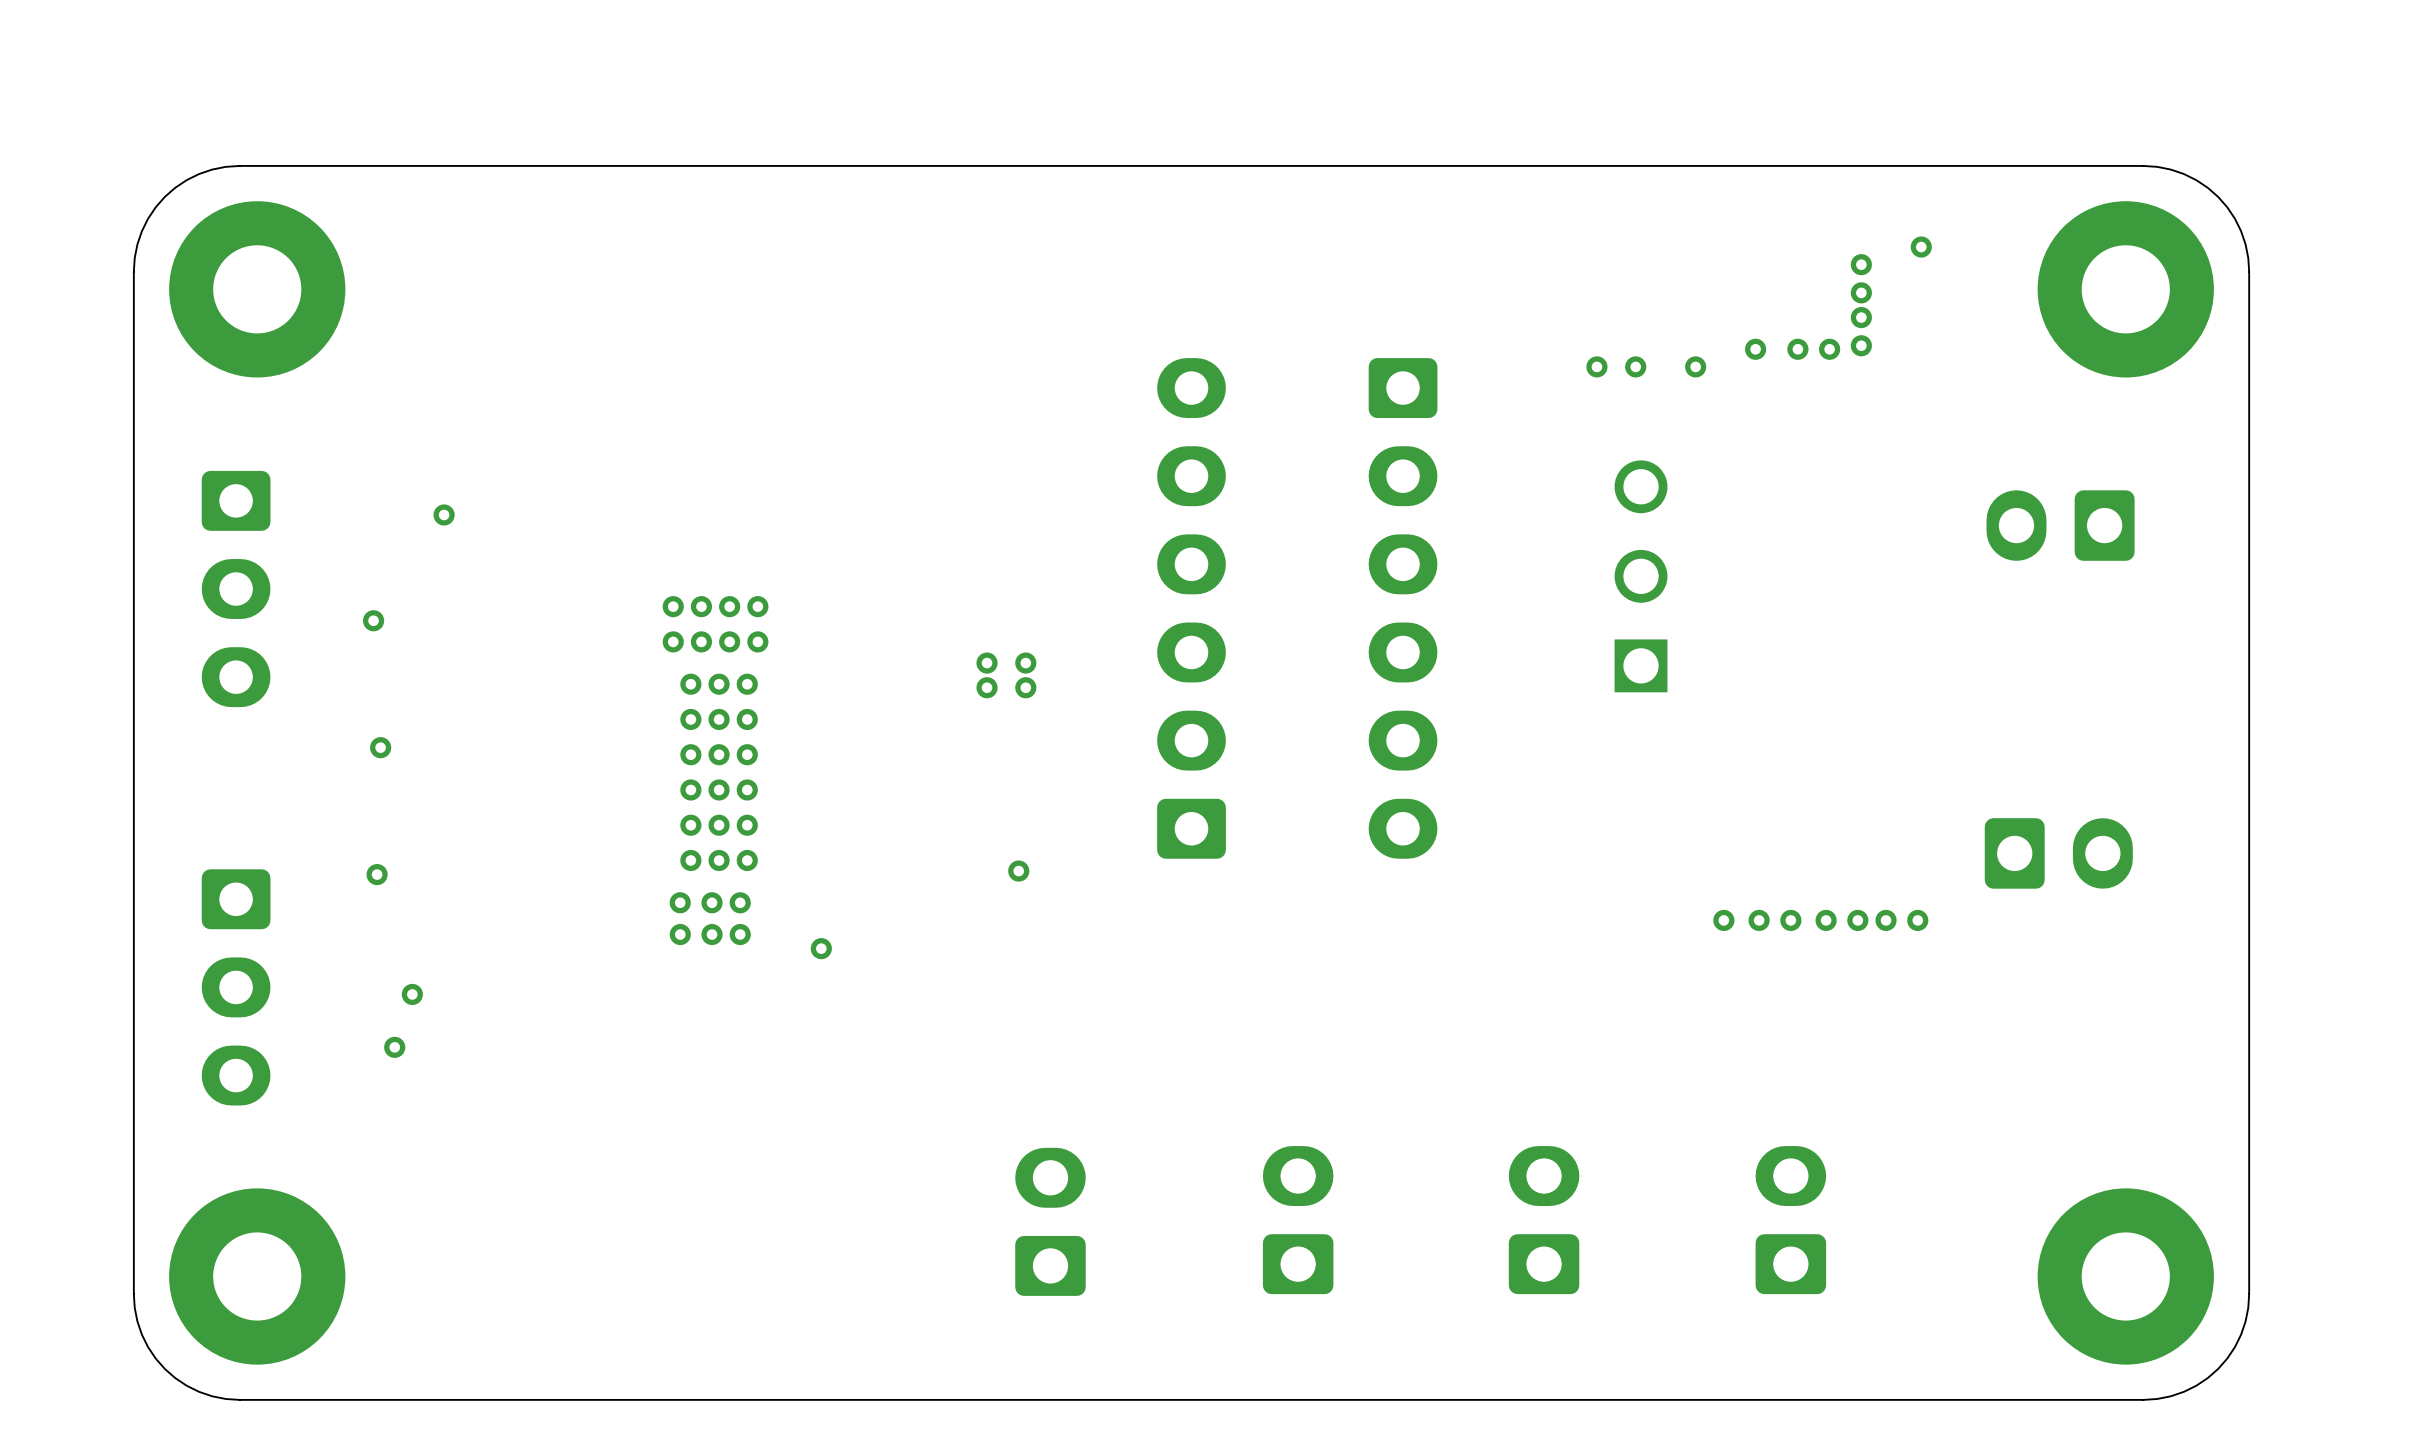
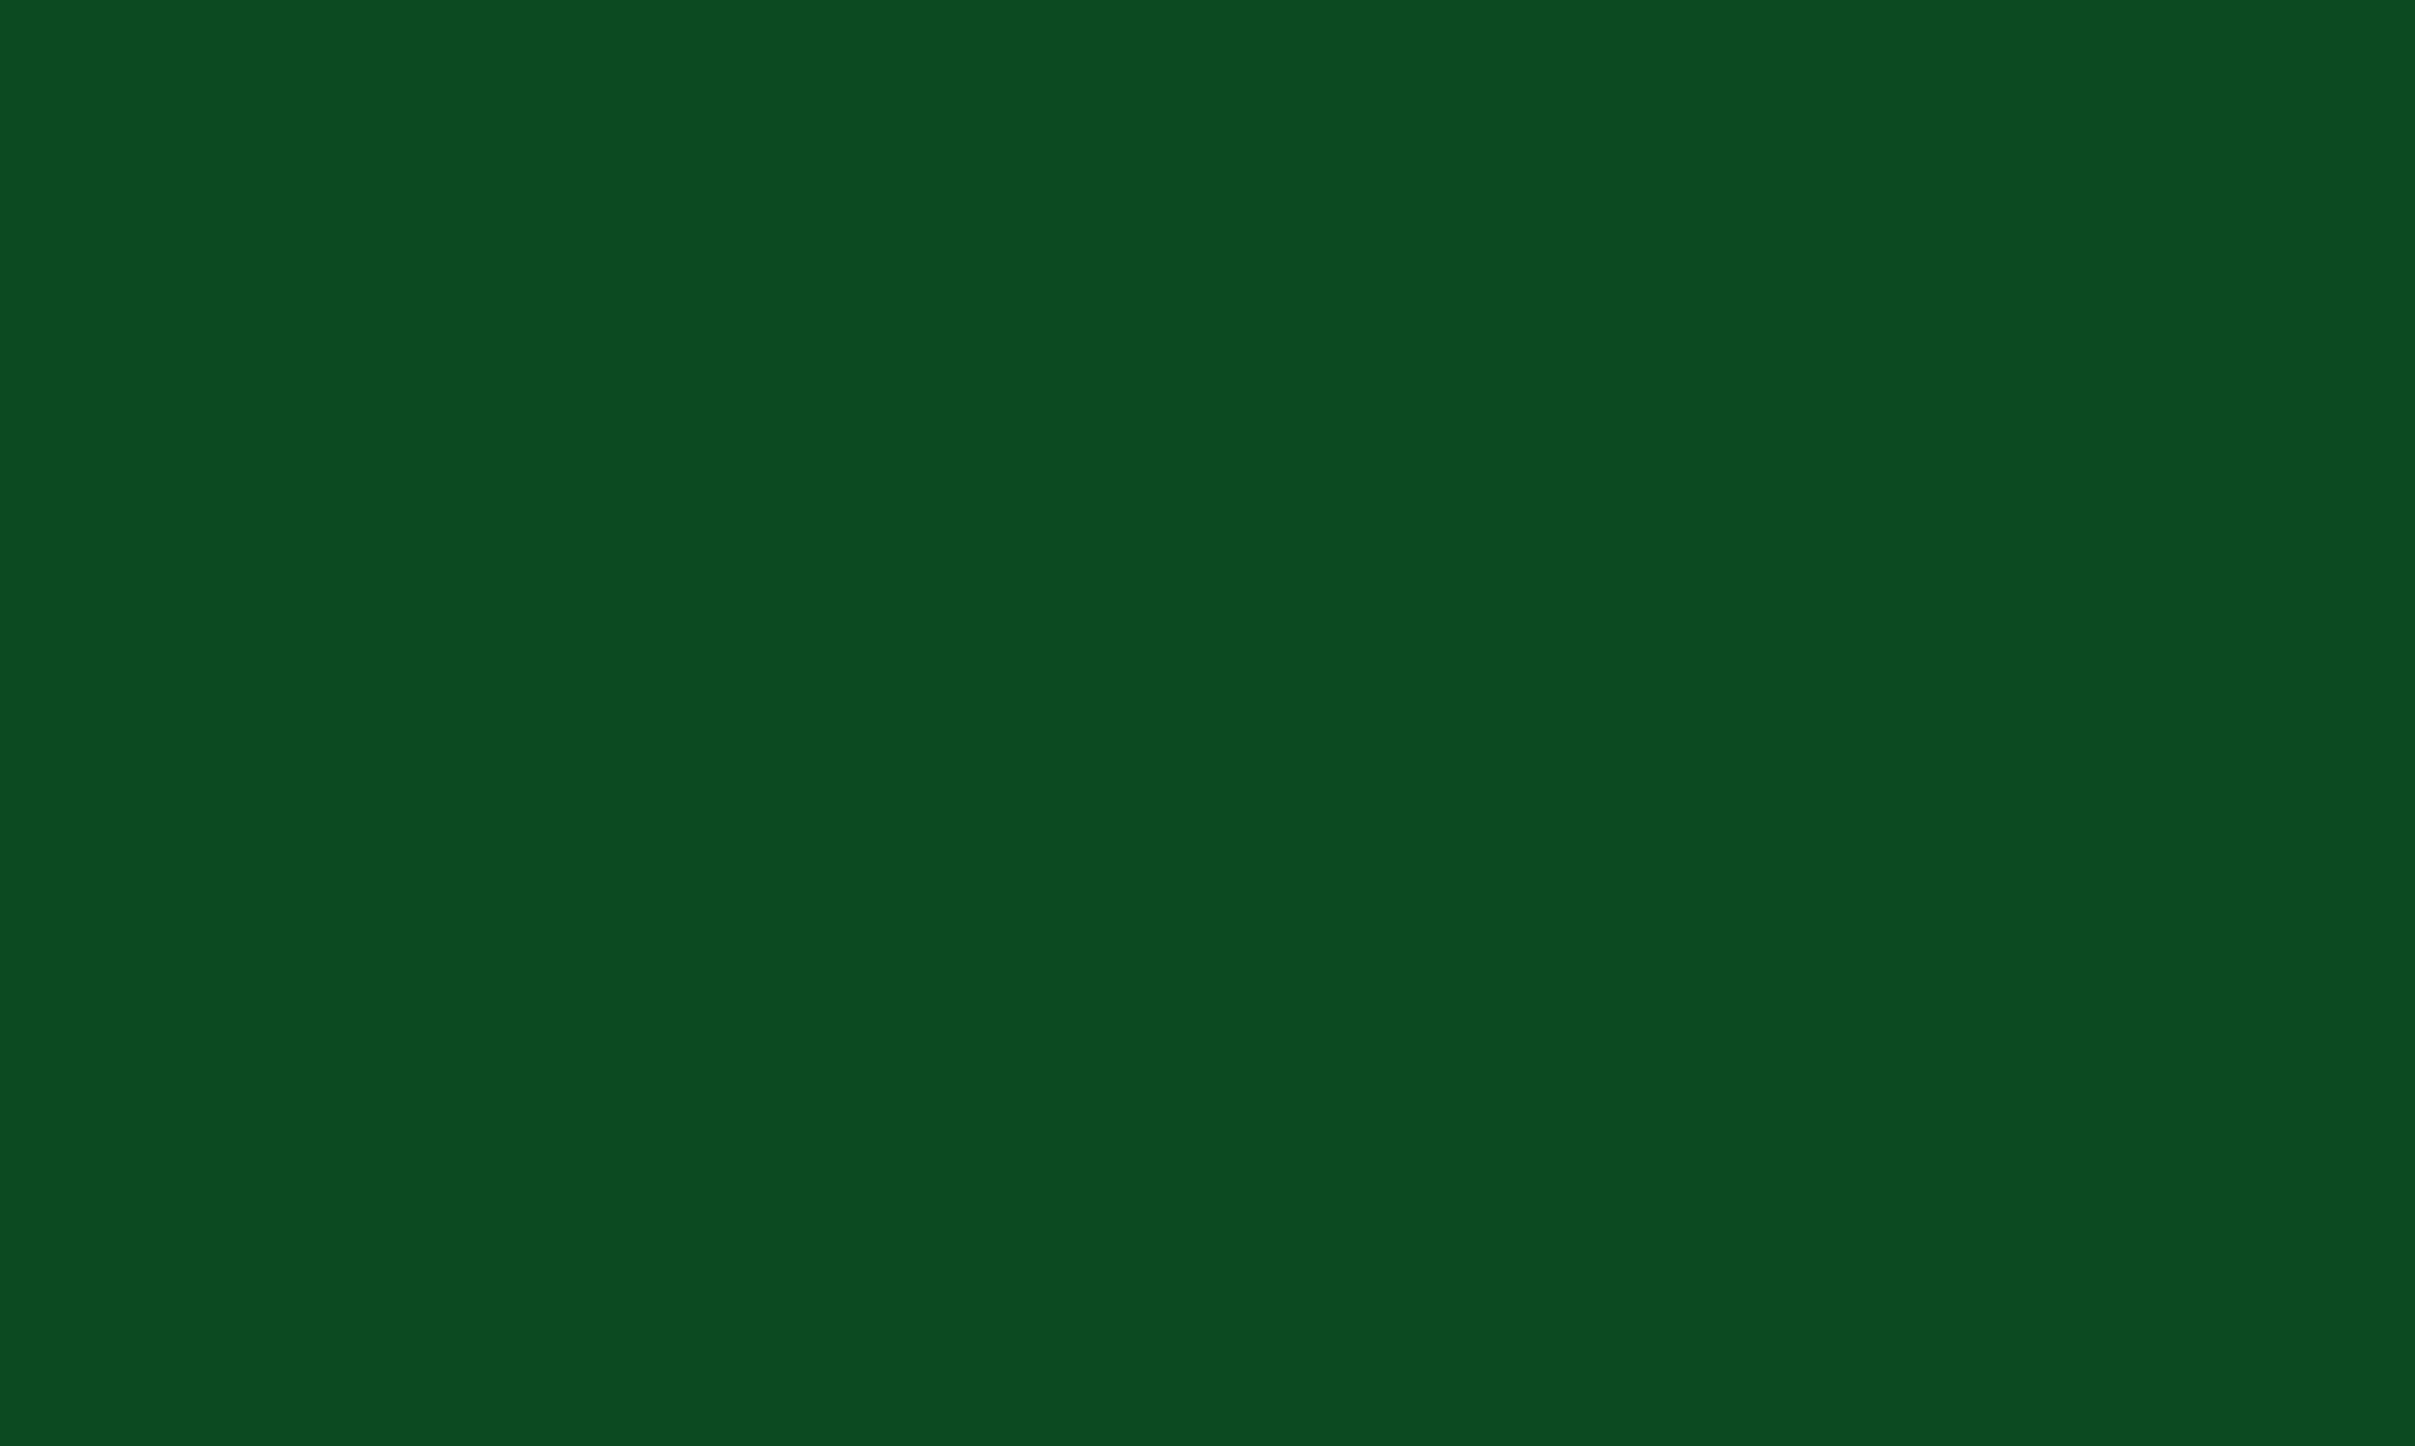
board edge: (2143, 165) (239, 165) (212, 169) (186, 180) (164, 196) (148, 218) (137, 244) (133, 271) (133, 1294) (137, 1321) (148, 1347) (164, 1368) (186, 1385) (212, 1396) (239, 1399) (2143, 1399) (2170, 1396) (2196, 1385) (2218, 1368) (2235, 1347) (2245, 1321) (2249, 1294) (2249, 271) (2248, 257) (2241, 231) (2227, 207) (2218, 196) (2207, 187) (2183, 174) (2170, 169) (2143, 165) -> none
via: (1921, 247) -> none
via: (1861, 264) -> none
part: (257, 289) -> none
part: (2125, 289) -> none
via: (1861, 292) -> none
via: (1861, 317) -> none
via: (1861, 345) -> none
via: (1755, 349) -> none
via: (1797, 349) -> none
via: (1829, 349) -> none
via: (1596, 366) -> none
via: (1635, 366) -> none
via: (1695, 366) -> none
via: (444, 514) -> none
part: (2060, 525) -> none
part: (1641, 576) -> none
part: (236, 589) -> none
via: (673, 606) -> none
via: (701, 606) -> none
via: (729, 606) -> none
via: (757, 606) -> none
part: (1191, 608) -> none
part: (1403, 608) -> none
via: (373, 620) -> none
via: (673, 641) -> none
via: (701, 641) -> none
via: (729, 641) -> none
via: (757, 641) -> none
via: (987, 663) -> none
via: (1025, 663) -> none
via: (690, 684) -> none
via: (719, 684) -> none
via: (747, 684) -> none
via: (987, 687) -> none
via: (1025, 687) -> none
via: (690, 719) -> none
via: (719, 719) -> none
via: (747, 719) -> none
via: (380, 747) -> none
via: (690, 754) -> none
via: (719, 754) -> none
via: (747, 754) -> none
via: (690, 789) -> none
via: (719, 789) -> none
via: (747, 789) -> none
via: (690, 825) -> none
via: (719, 825) -> none
via: (747, 825) -> none
part: (2058, 853) -> none
via: (690, 860) -> none
via: (719, 860) -> none
via: (747, 860) -> none
via: (1018, 871) -> none
via: (377, 874) -> none
via: (680, 902) -> none
via: (712, 902) -> none
via: (740, 902) -> none
via: (1723, 920) -> none
via: (1759, 920) -> none
via: (1790, 920) -> none
via: (1826, 920) -> none
via: (1857, 920) -> none
via: (1886, 920) -> none
via: (1917, 920) -> none
via: (680, 934) -> none
via: (712, 934) -> none
via: (740, 934) -> none
via: (821, 948) -> none
part: (236, 987) -> none
via: (412, 994) -> none
via: (394, 1047) -> none
part: (1298, 1220) -> none
part: (1544, 1220) -> none
part: (1790, 1220) -> none
part: (1050, 1221) -> none
part: (257, 1276) -> none
part: (2125, 1276) -> none

